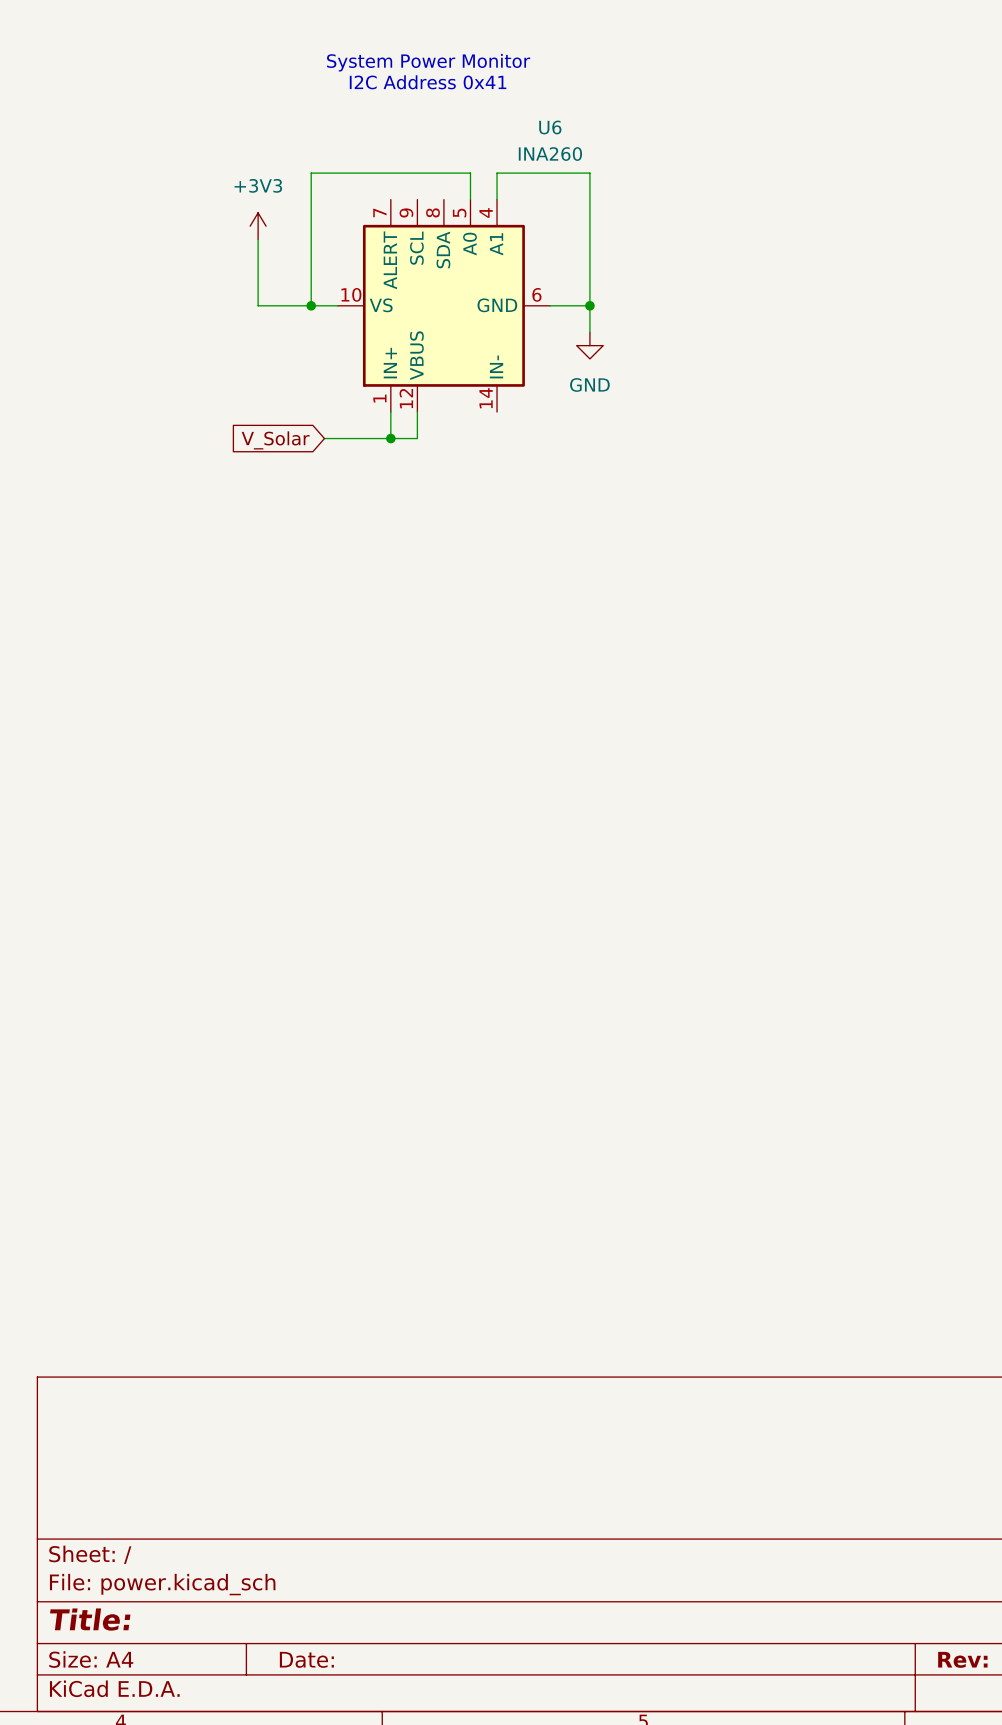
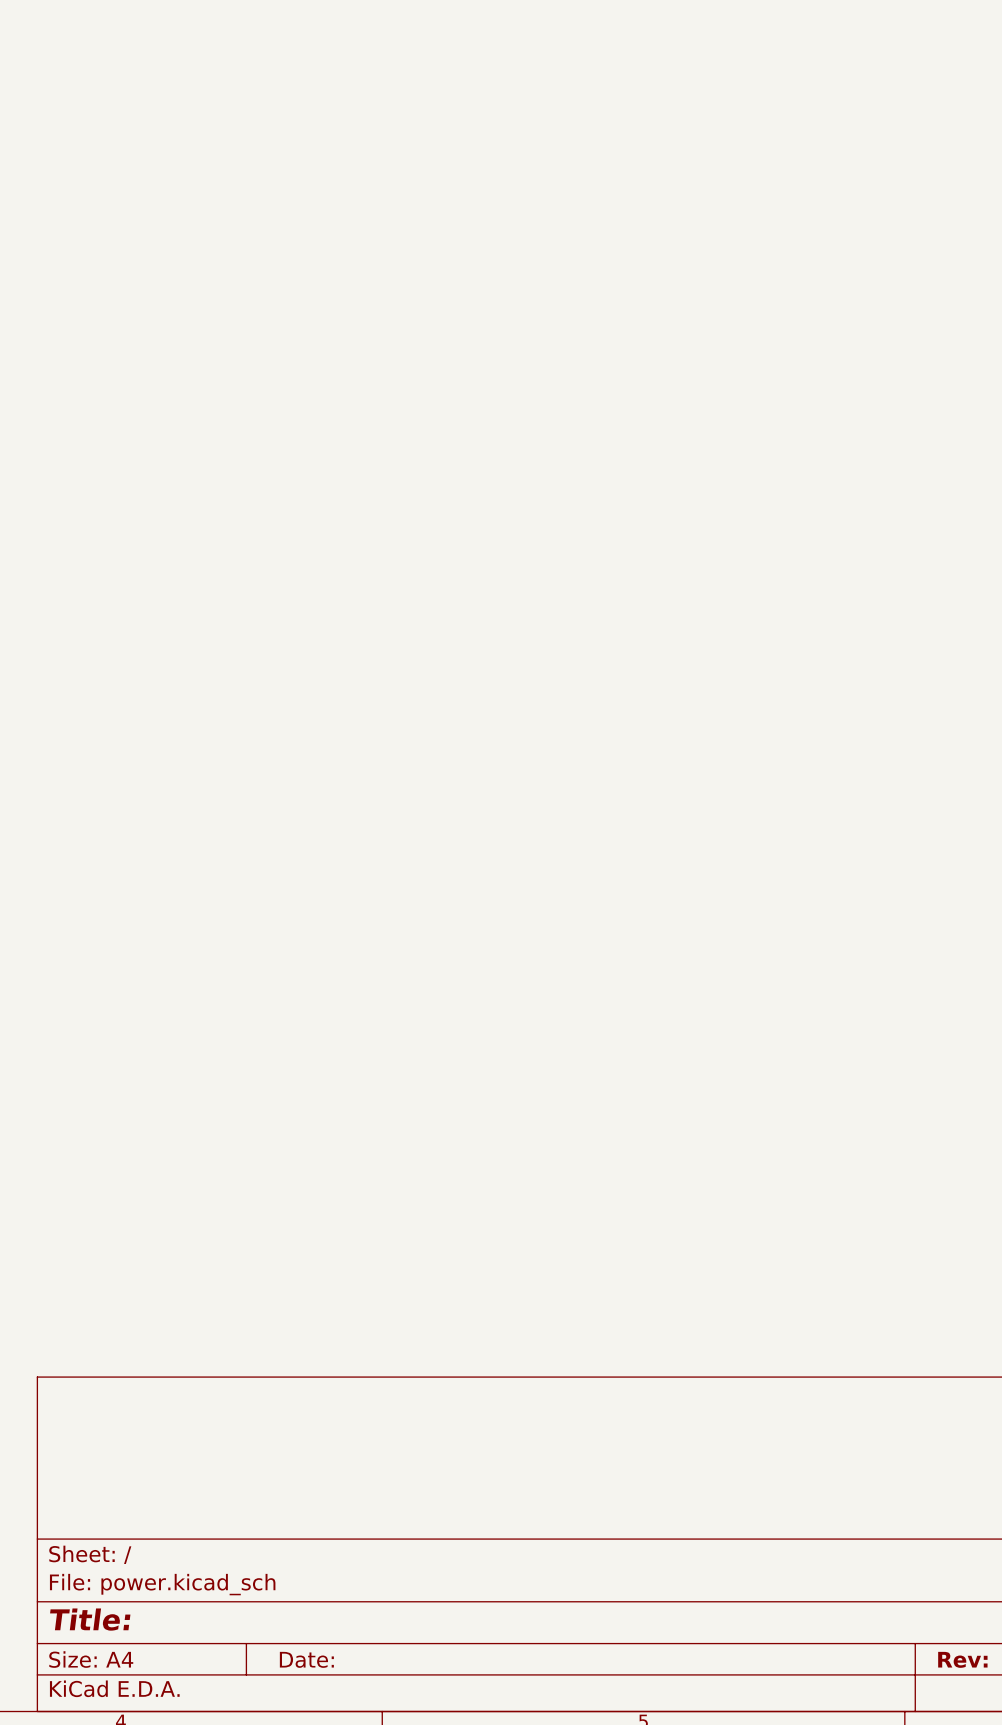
text: System Power Monitor (428, 62) -> none
text: I2C Address 0x41 (428, 82) -> none
wire: (470, 199) (470, 173) (311, 173) (311, 305) -> none
wire: (497, 199) (497, 173) (589, 173) (589, 332) -> none
power symbol: +3V3 (258, 226) -> none
wire: (258, 239) (258, 305) (337, 305) -> none
junction: (311, 305) -> none
U6: INA260 (443, 305) -> none
wire: (550, 305) (589, 305) -> none
junction: (589, 305) -> none
power symbol: GND (589, 345) -> none
wire: (390, 412) (390, 438) -> none
wire: (417, 412) (417, 438) (324, 438) -> none
junction: (390, 438) -> none
global label: V_Solar (275, 440) -> none

